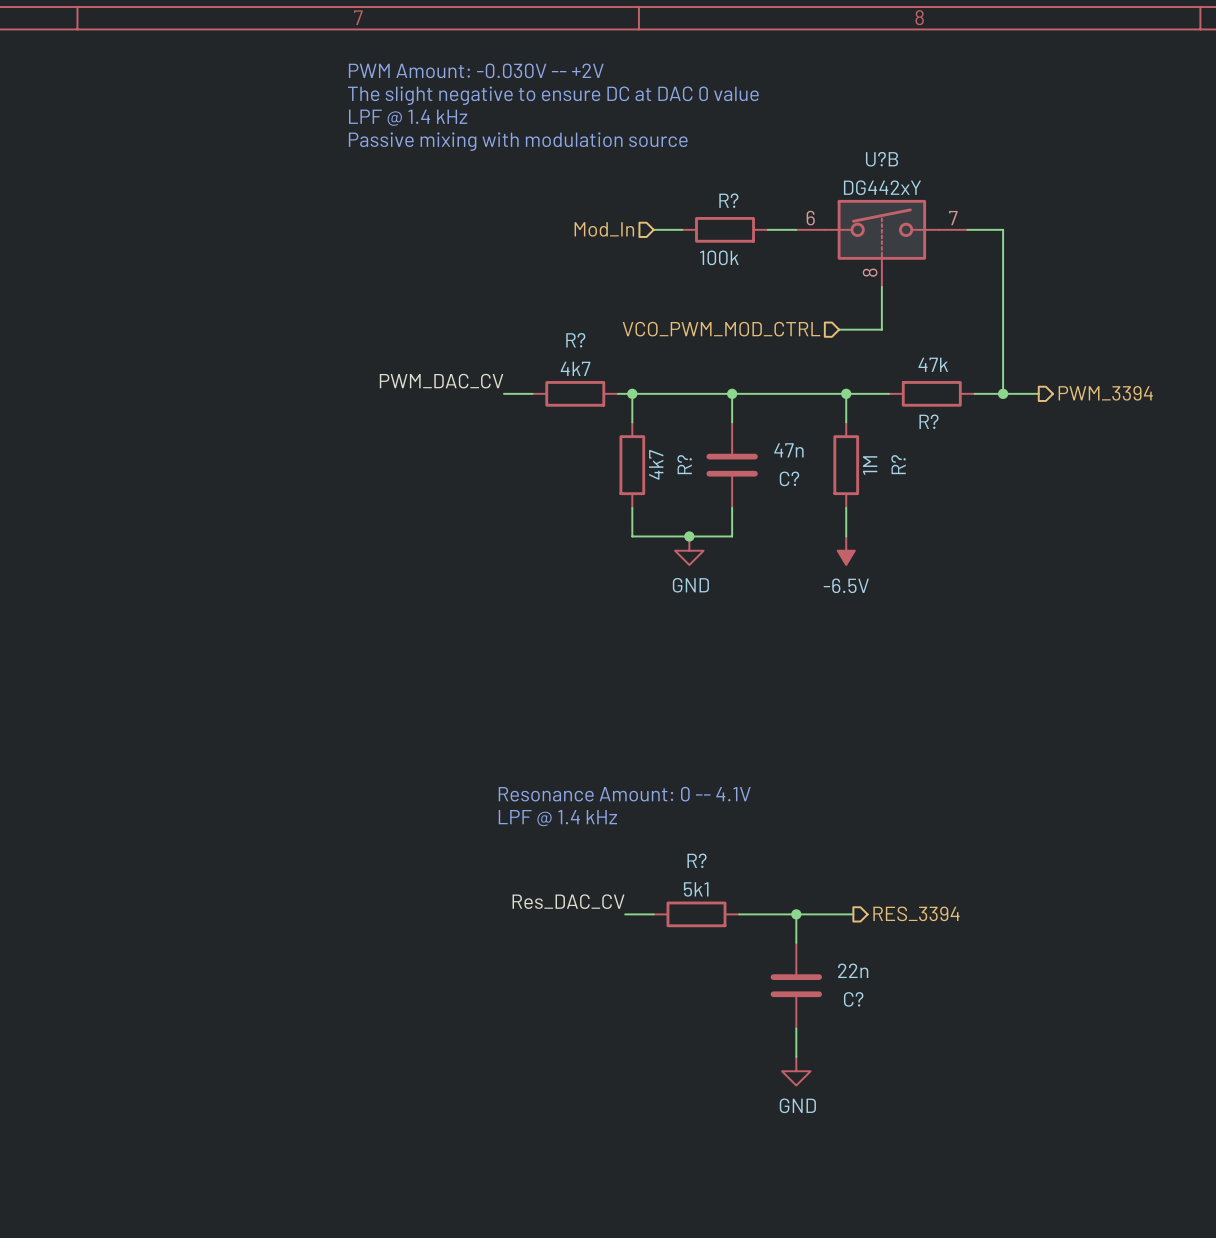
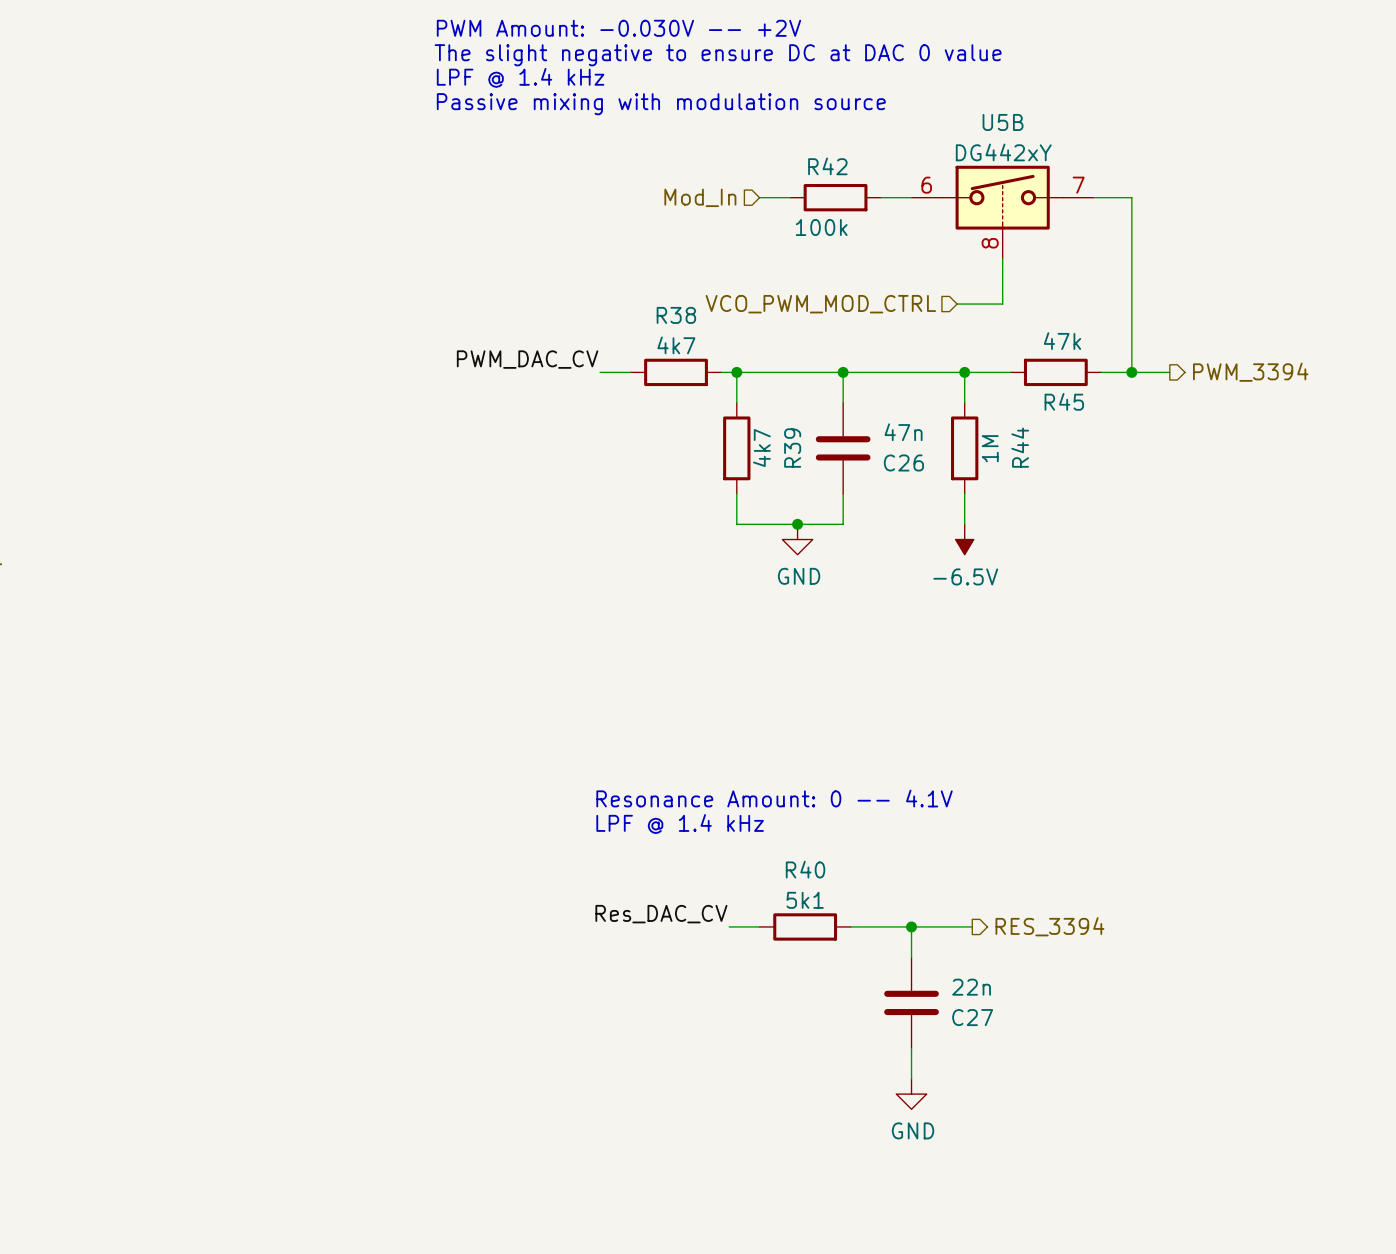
U?B name: U?B (882, 159) -> U5B (1003, 122)
R? name: R? (728, 200) -> R42 (827, 166)
R? name: R? (575, 340) -> R38 (676, 315)
R? name: R? (928, 421) -> R45 (1064, 401)
R? name: R? (684, 464) -> R39 (792, 448)
R? name: R? (898, 464) -> R44 (1020, 447)
C? name: C? (789, 478) -> C26 (903, 462)
R? name: R? (697, 860) -> R40 (805, 869)
C? name: C? (853, 999) -> C27 (972, 1017)

